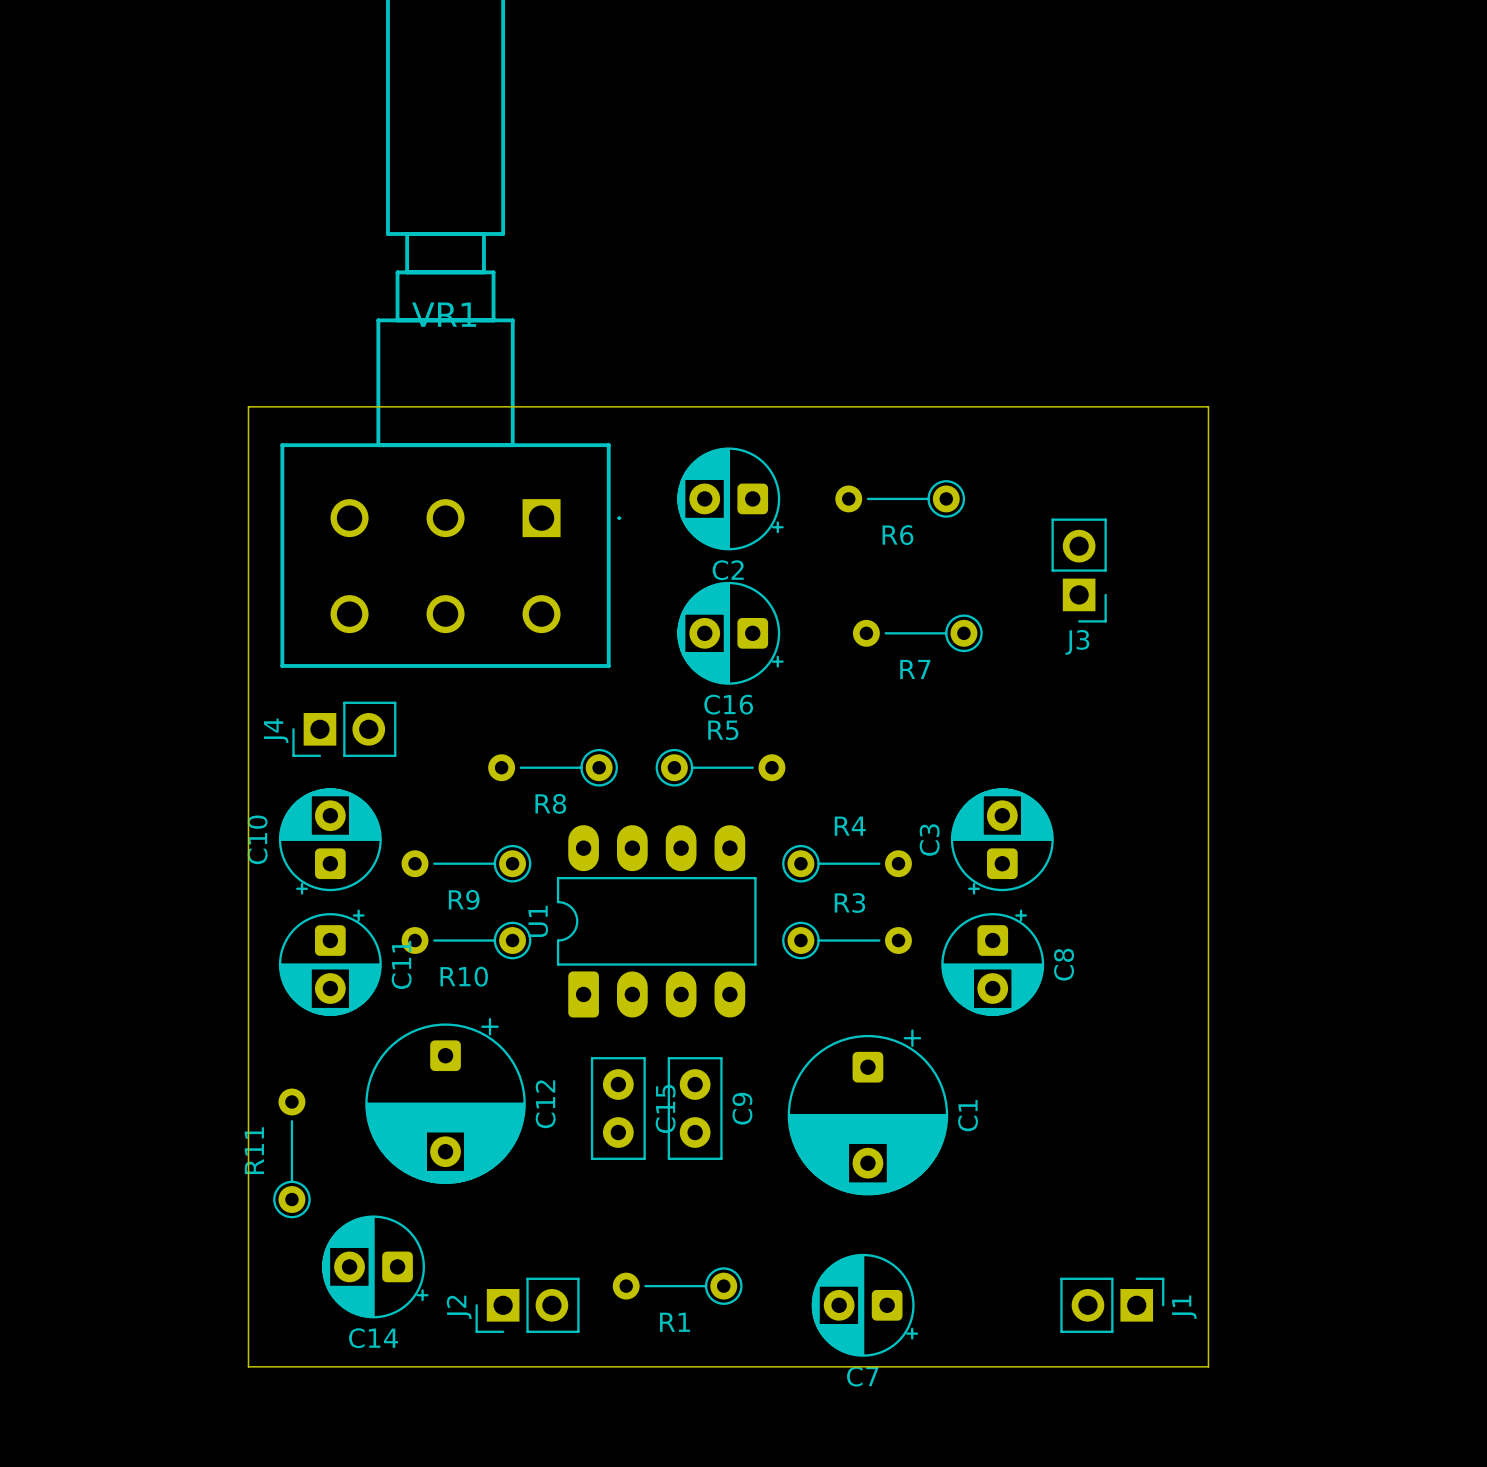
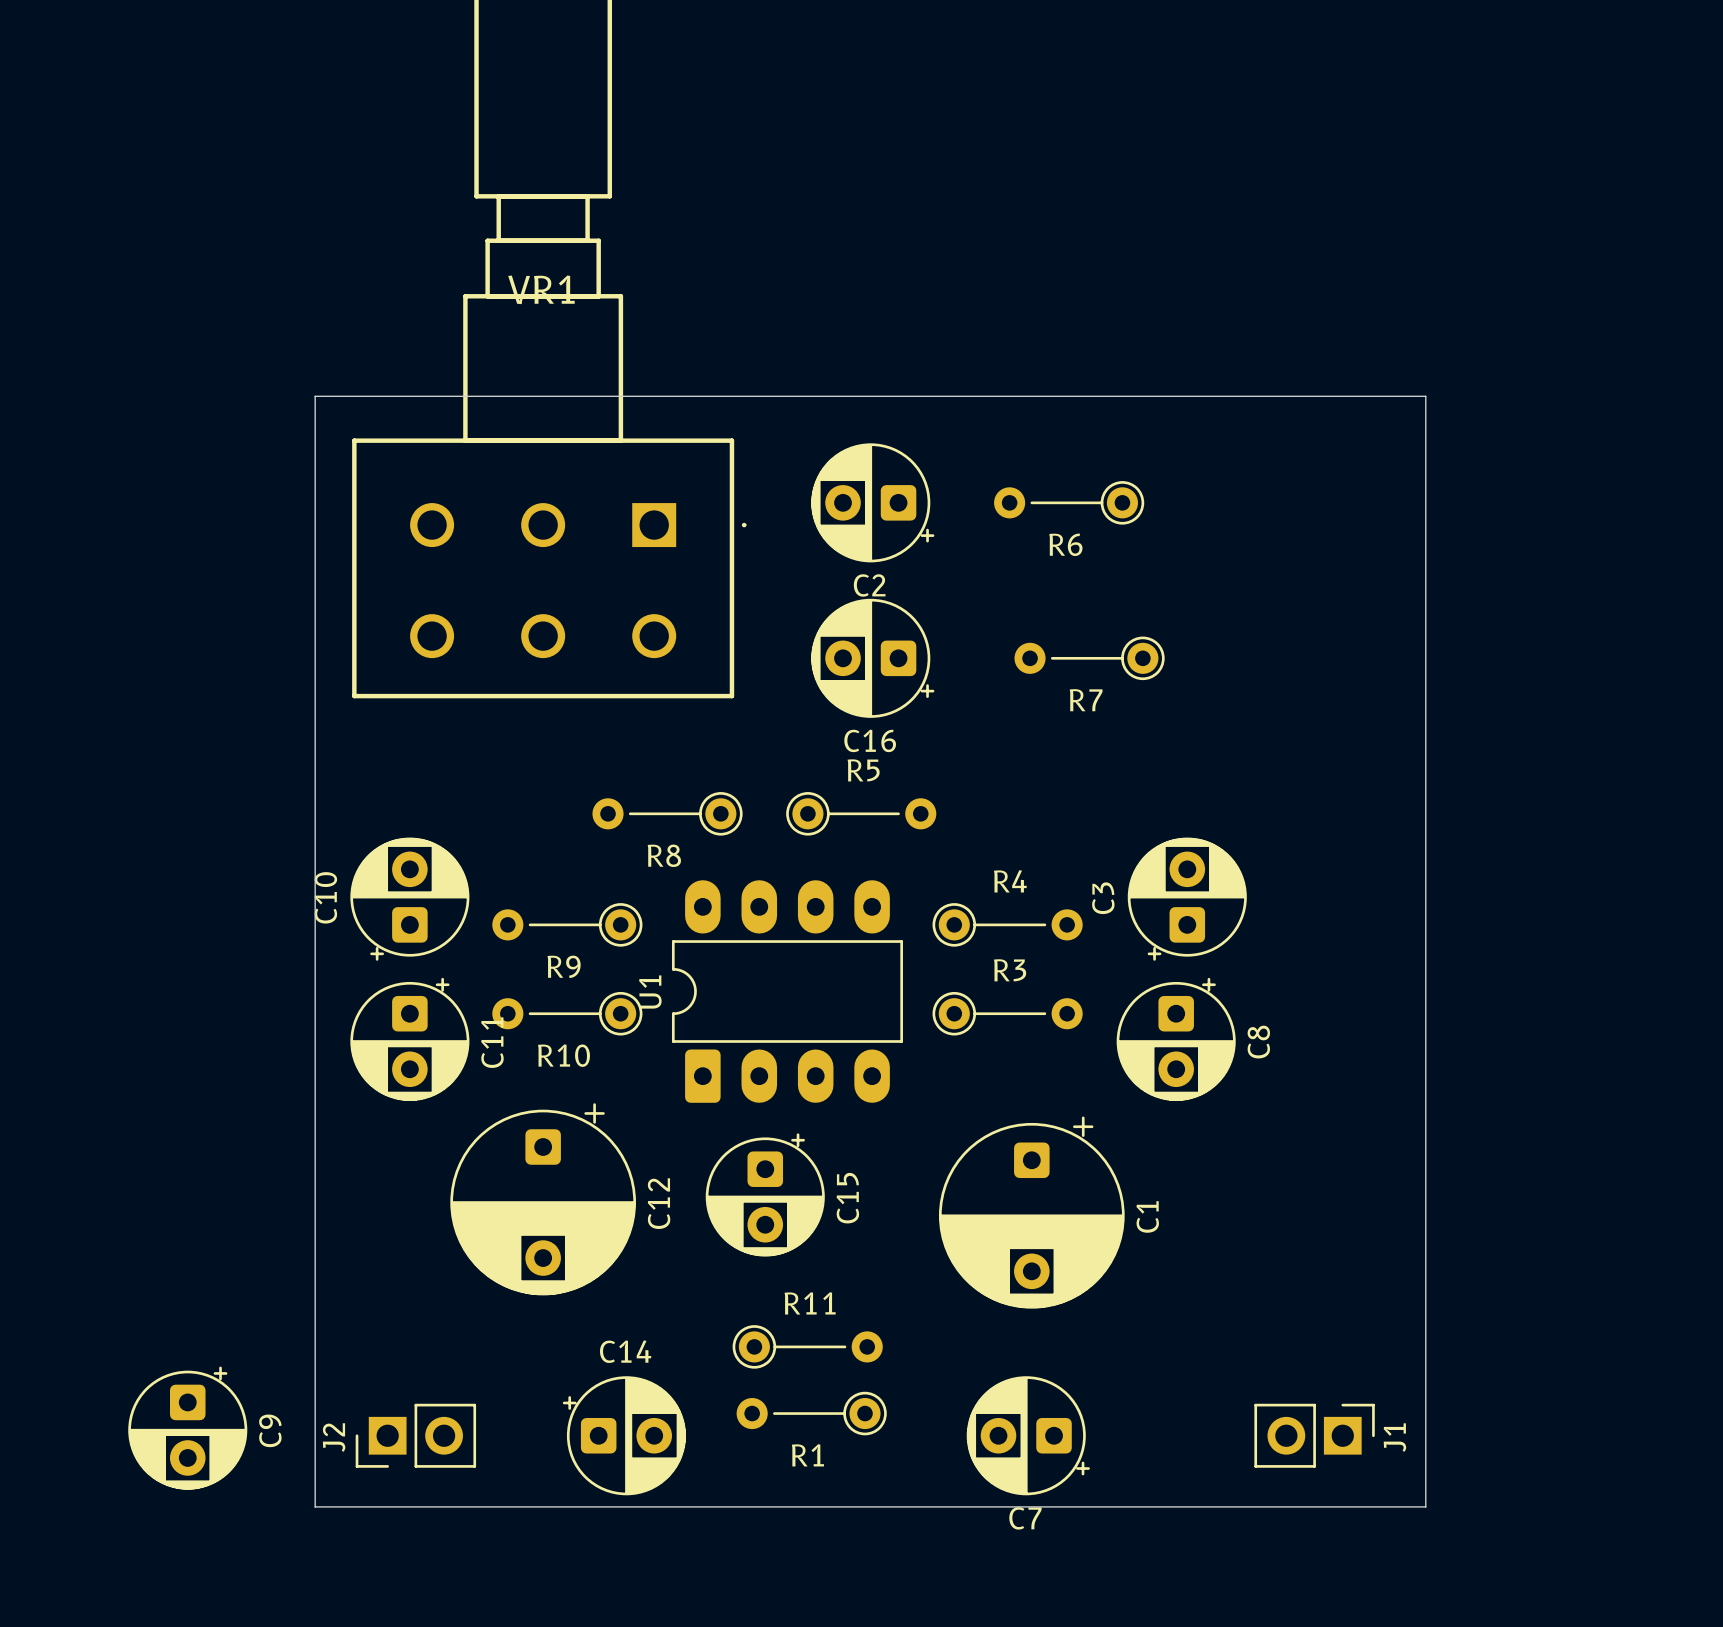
J3: (1079, 570) -> none
J4: (344, 729) -> none
C15 footprint: [590, 1057, 646, 1160] -> [705, 1133, 825, 1257]
C9 footprint: [667, 1057, 723, 1160] -> [128, 1366, 248, 1490]
R11 rotation: 0° (291, 1153) -> 90° clockwise (807, 1346)
R11 position: (291, 1153) -> (807, 1346)
C14 rotation: 0° (375, 1266) -> 180° (624, 1435)
C14 position: (375, 1266) -> (624, 1435)
J2 position: (527, 1305) -> (415, 1435)

